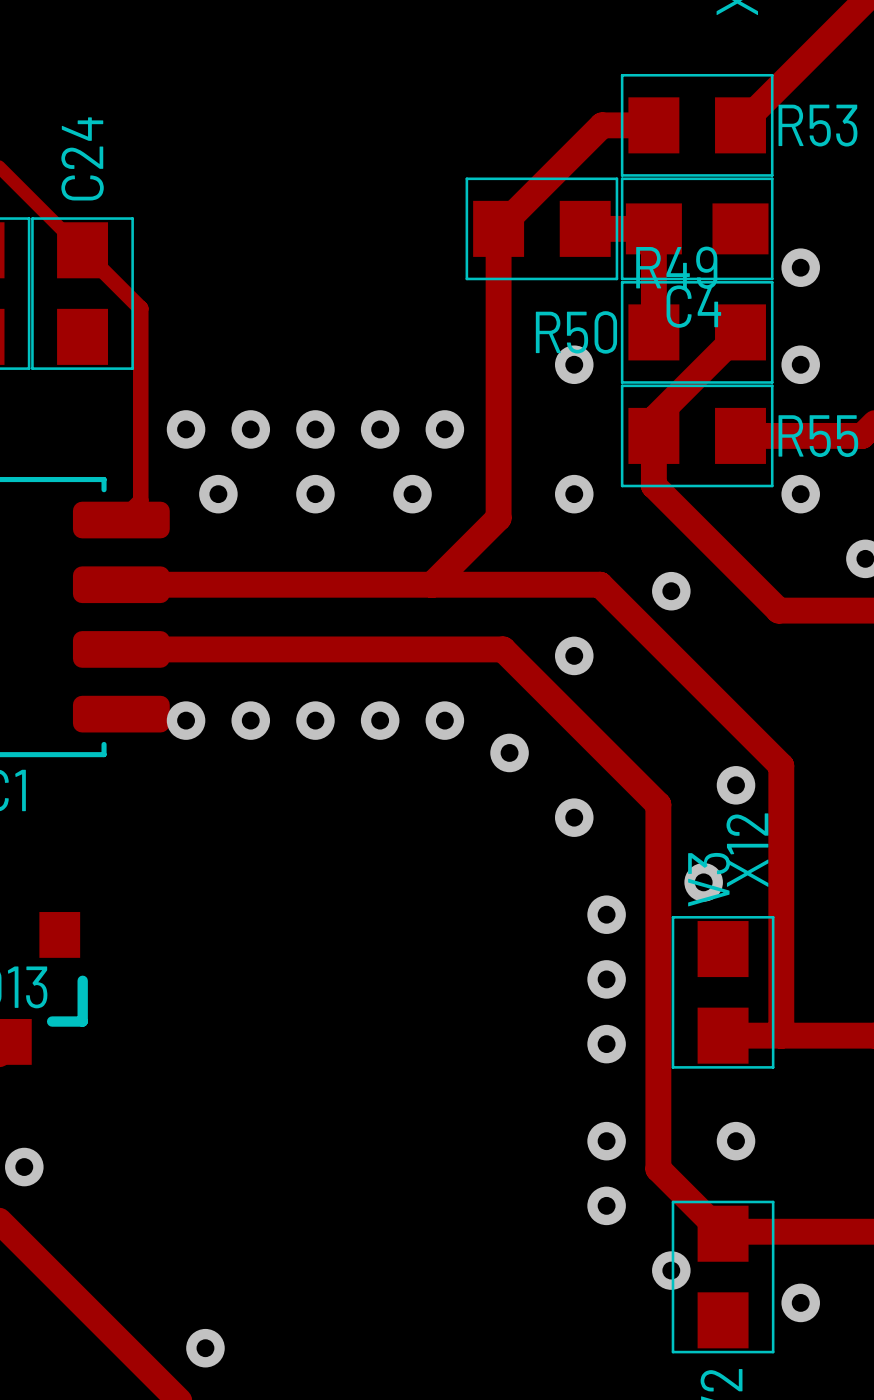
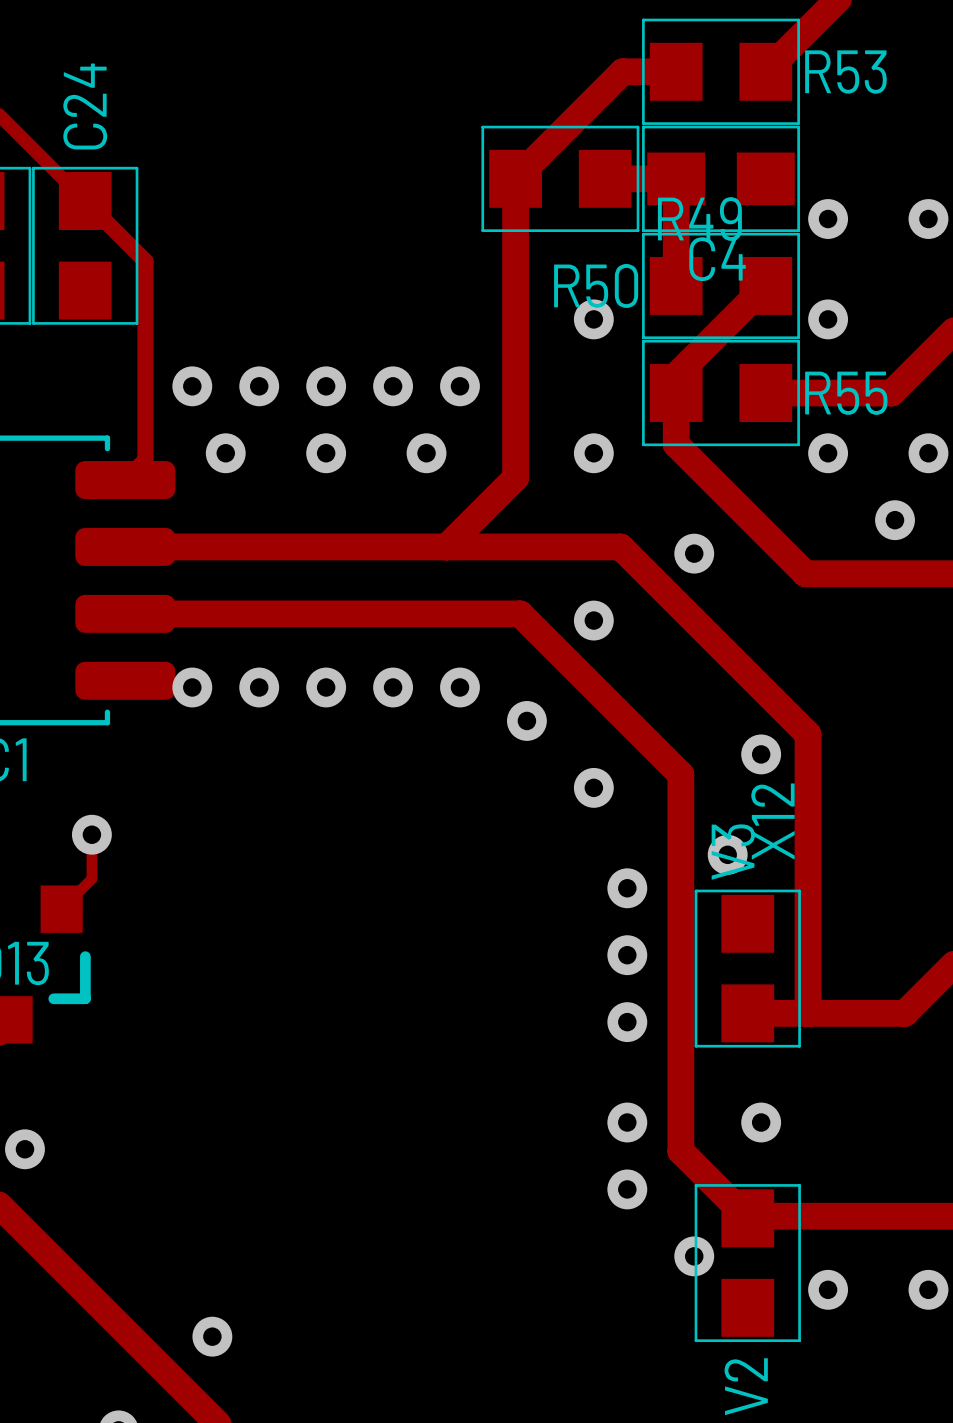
track: none -> (91, 834) (91, 878) (61, 909)
via: none -> (91, 834)

